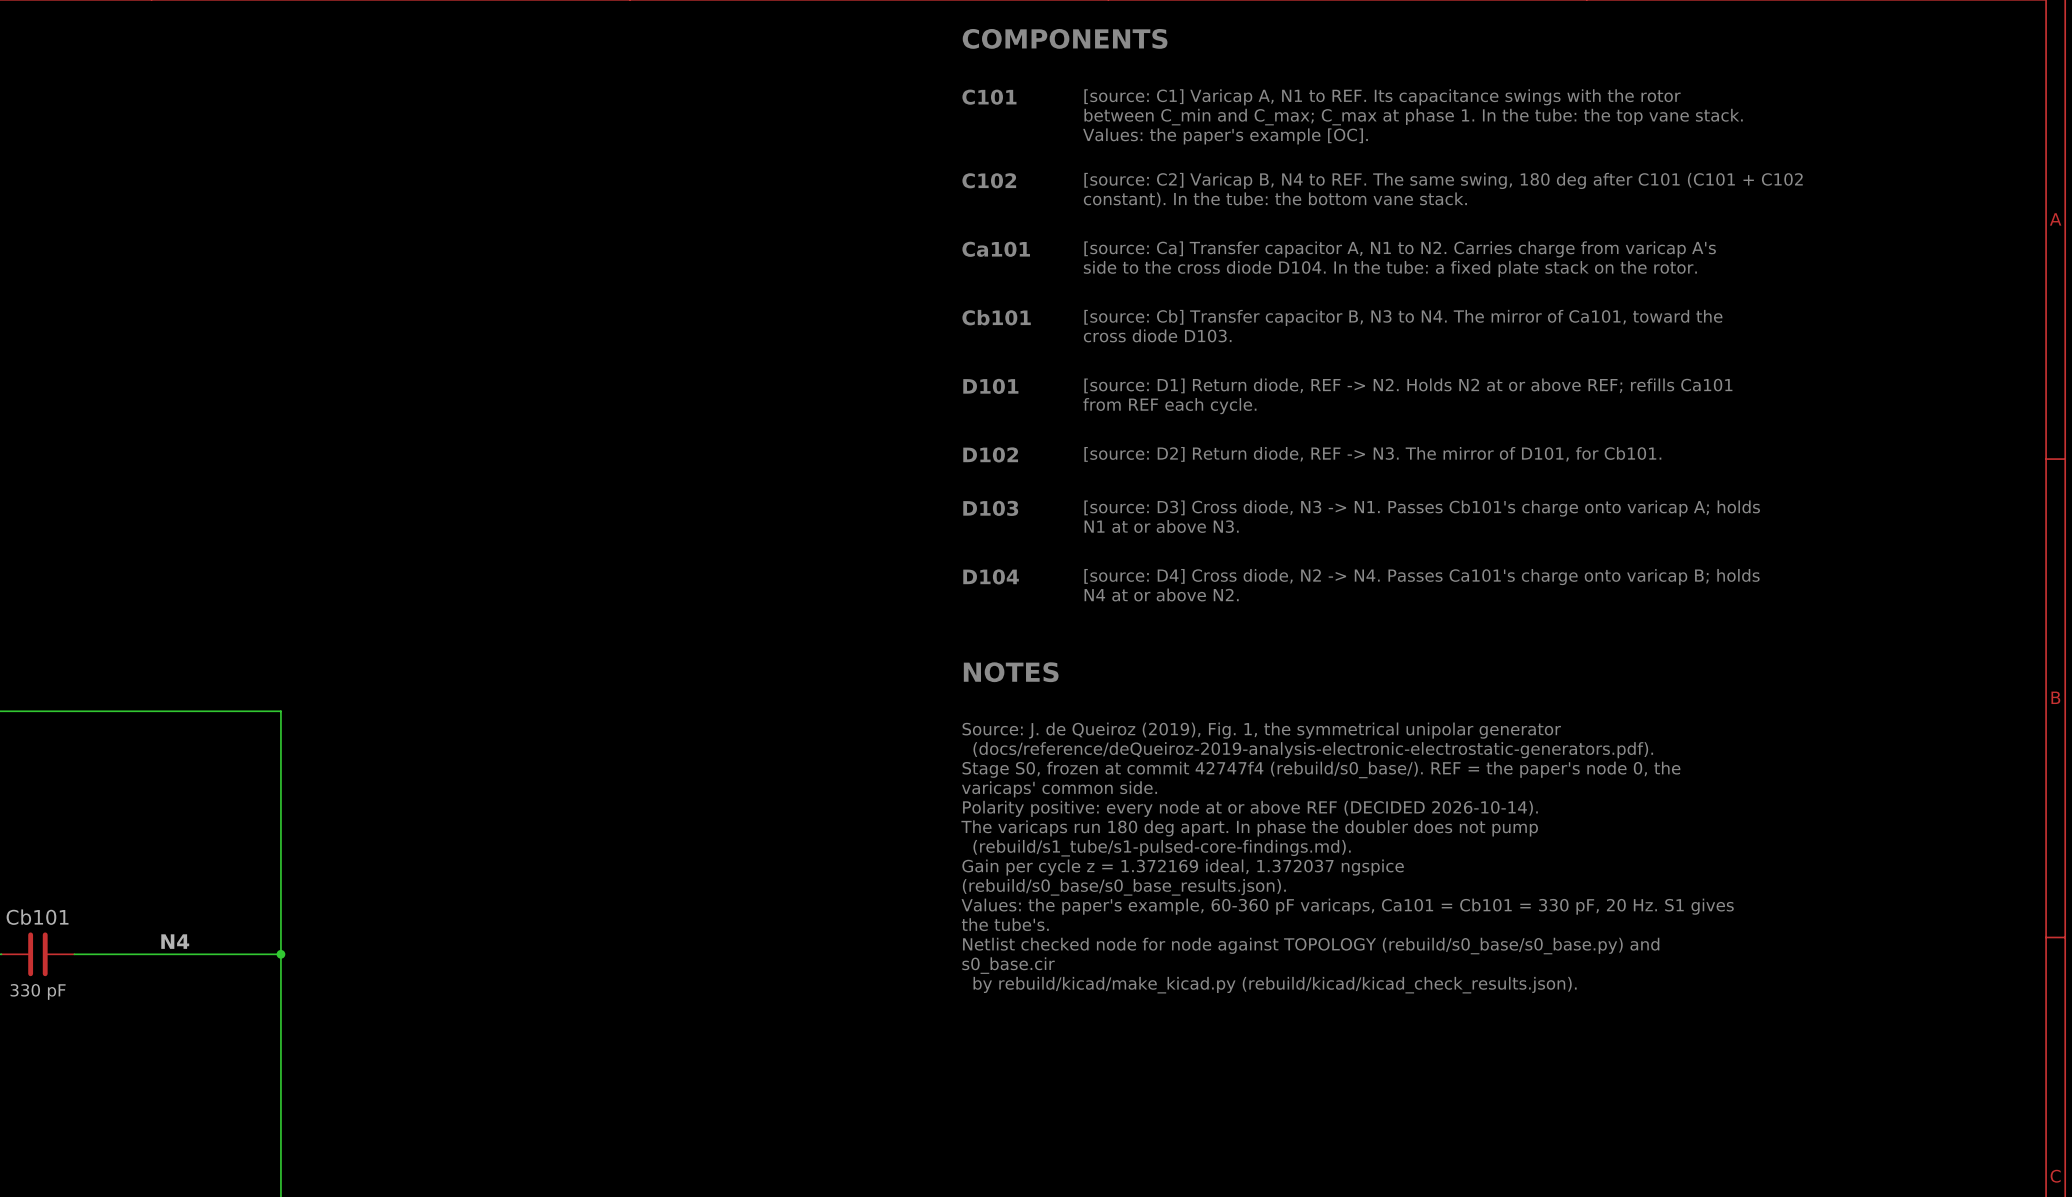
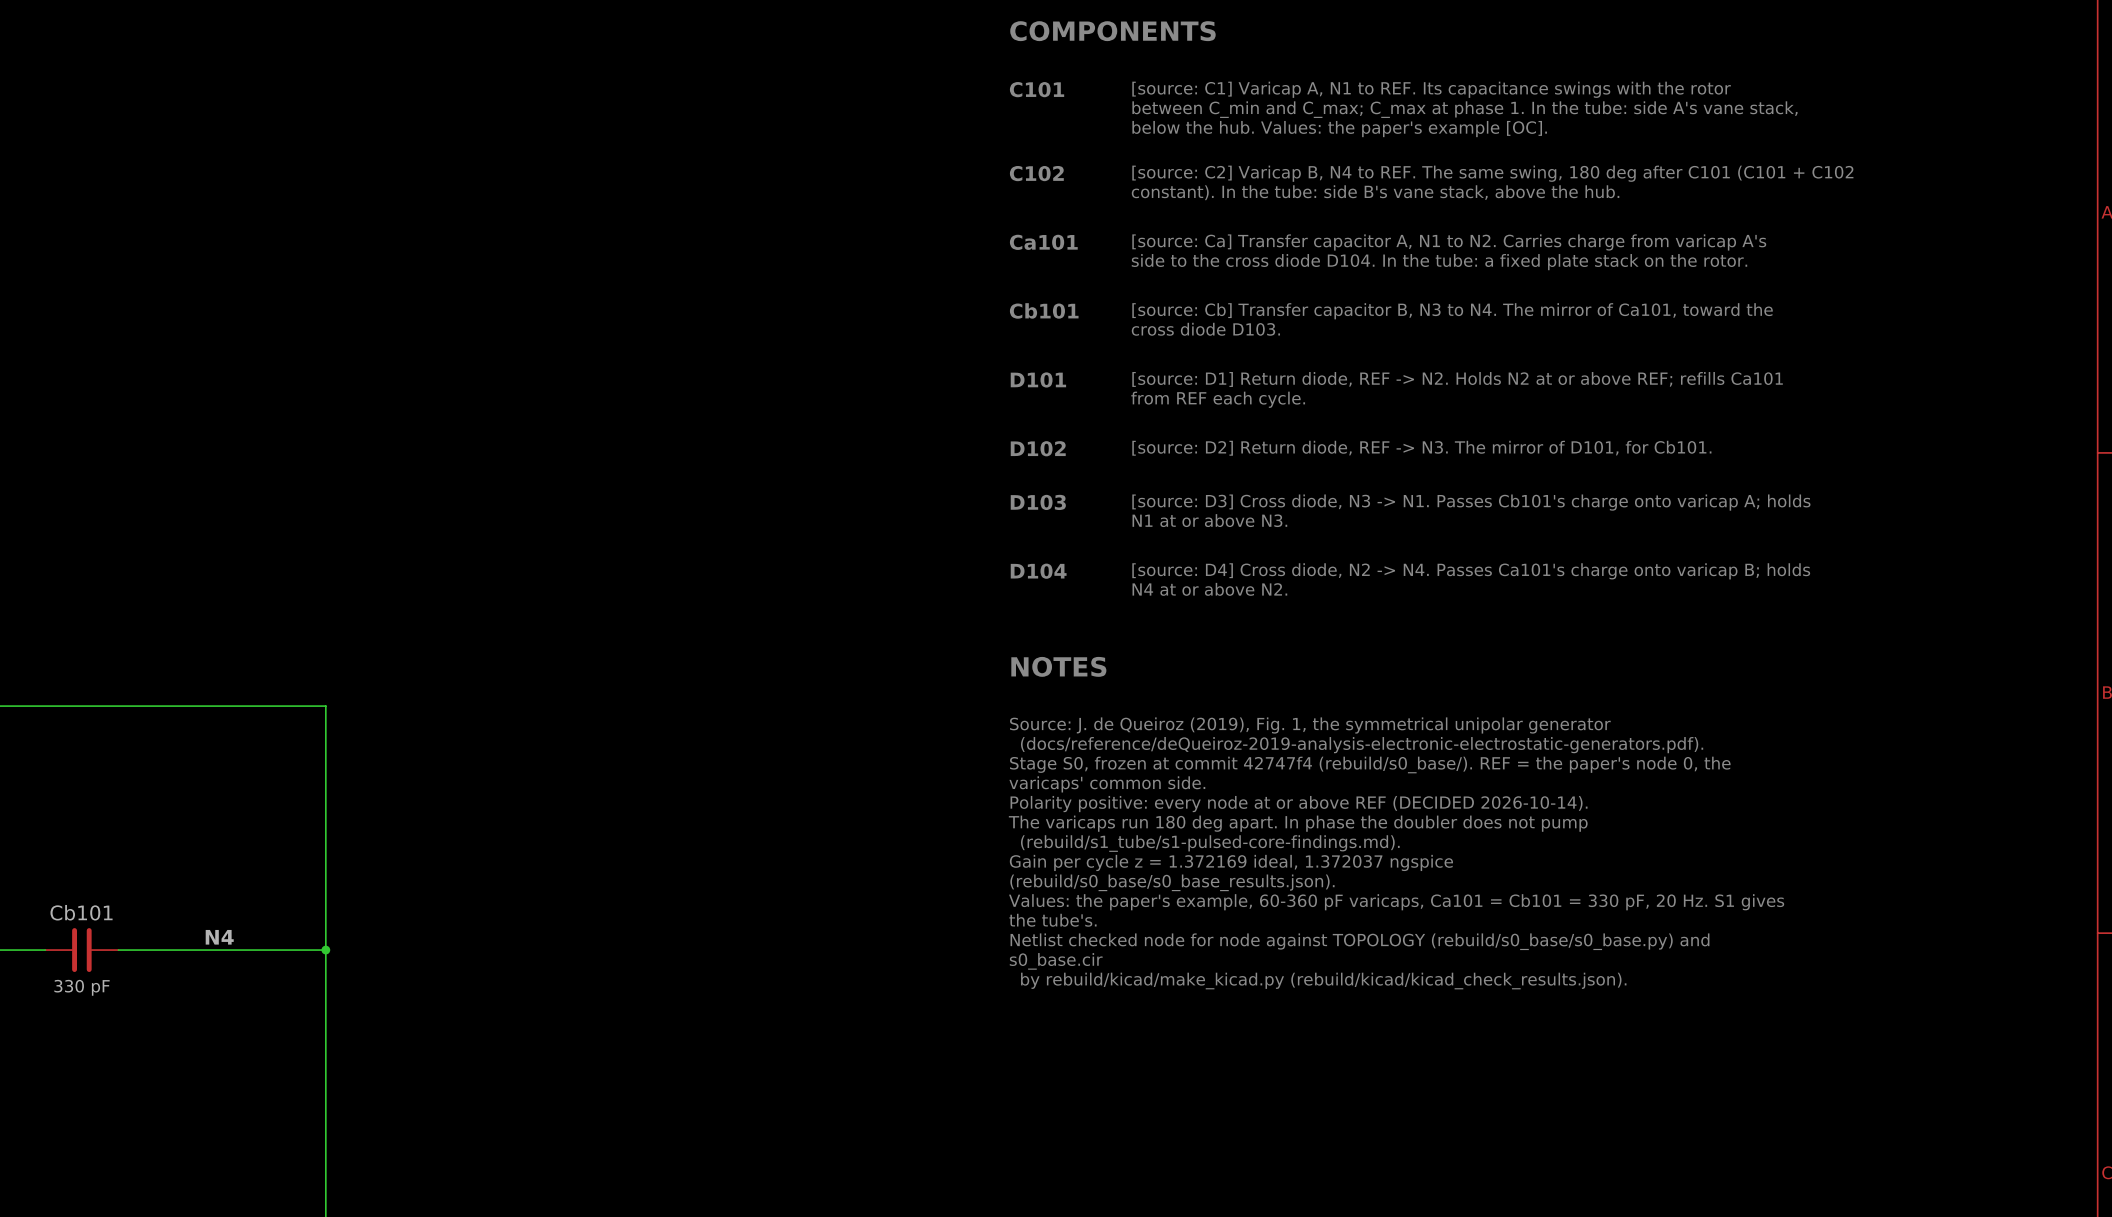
text: between C_min and C_max; C_max at phase 1. In the tube: the top vane stack. (1413, 117) -> between C_min and C_max; C_max at phase 1. In the tube: side A's vane stack, (1464, 109)
text: Values: the paper's example [OC]. (1225, 136) -> below the hub. Values: the paper's example [OC]. (1339, 129)
text: constant). In the tube: the bottom vane stack. (1275, 199) -> constant). In the tube: side B's vane stack, above the hub. (1375, 192)

